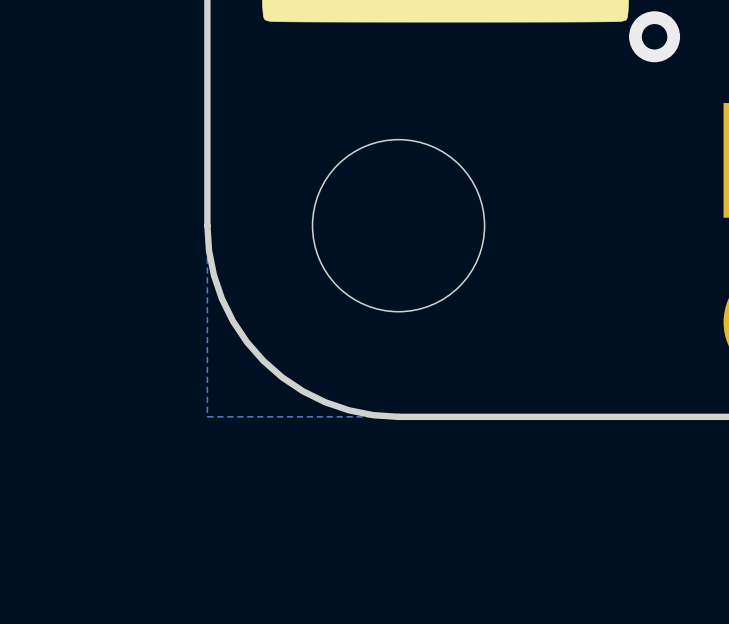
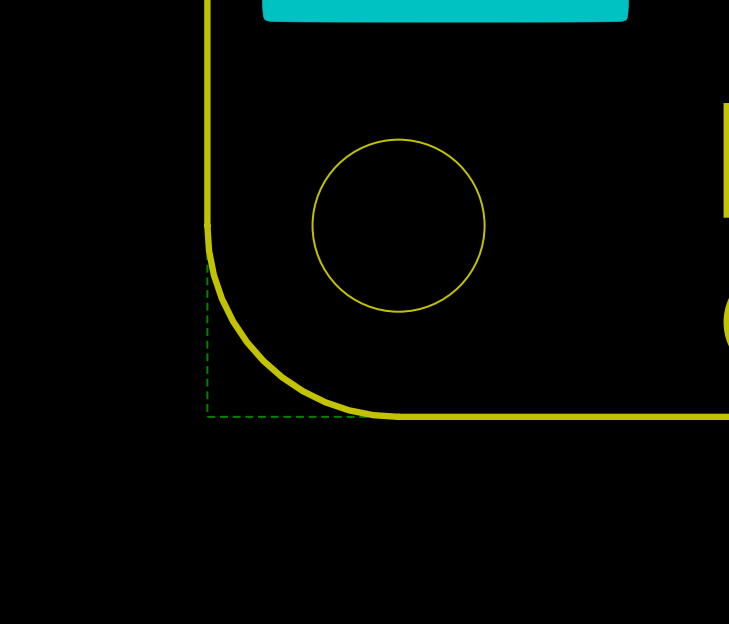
via: (654, 36) -> none

